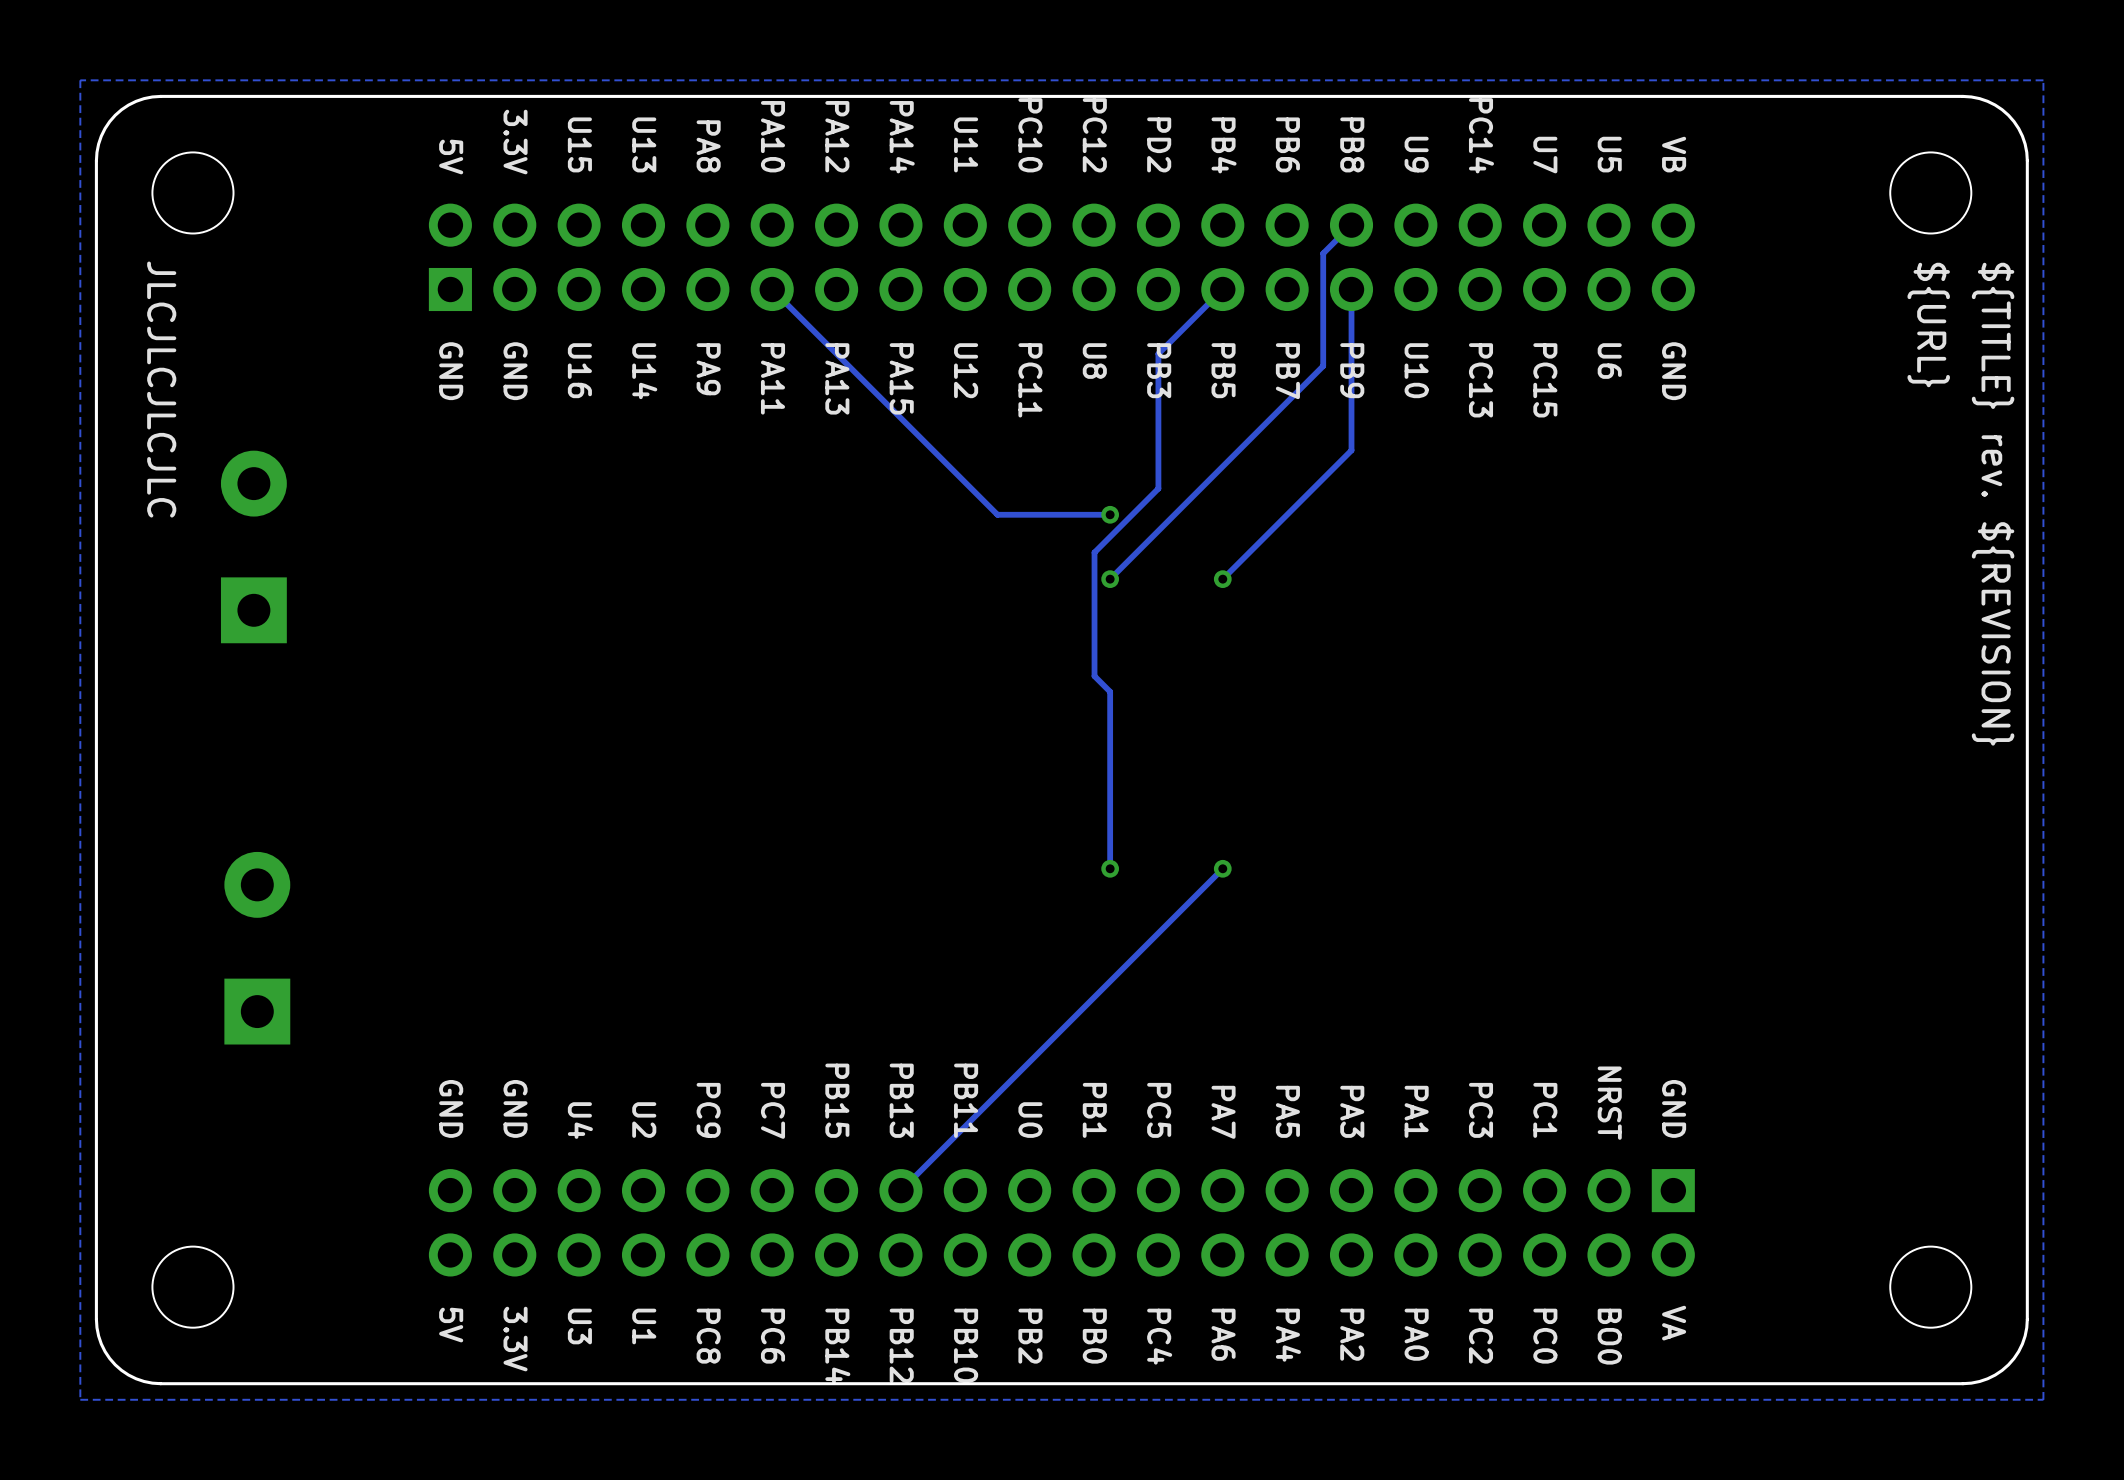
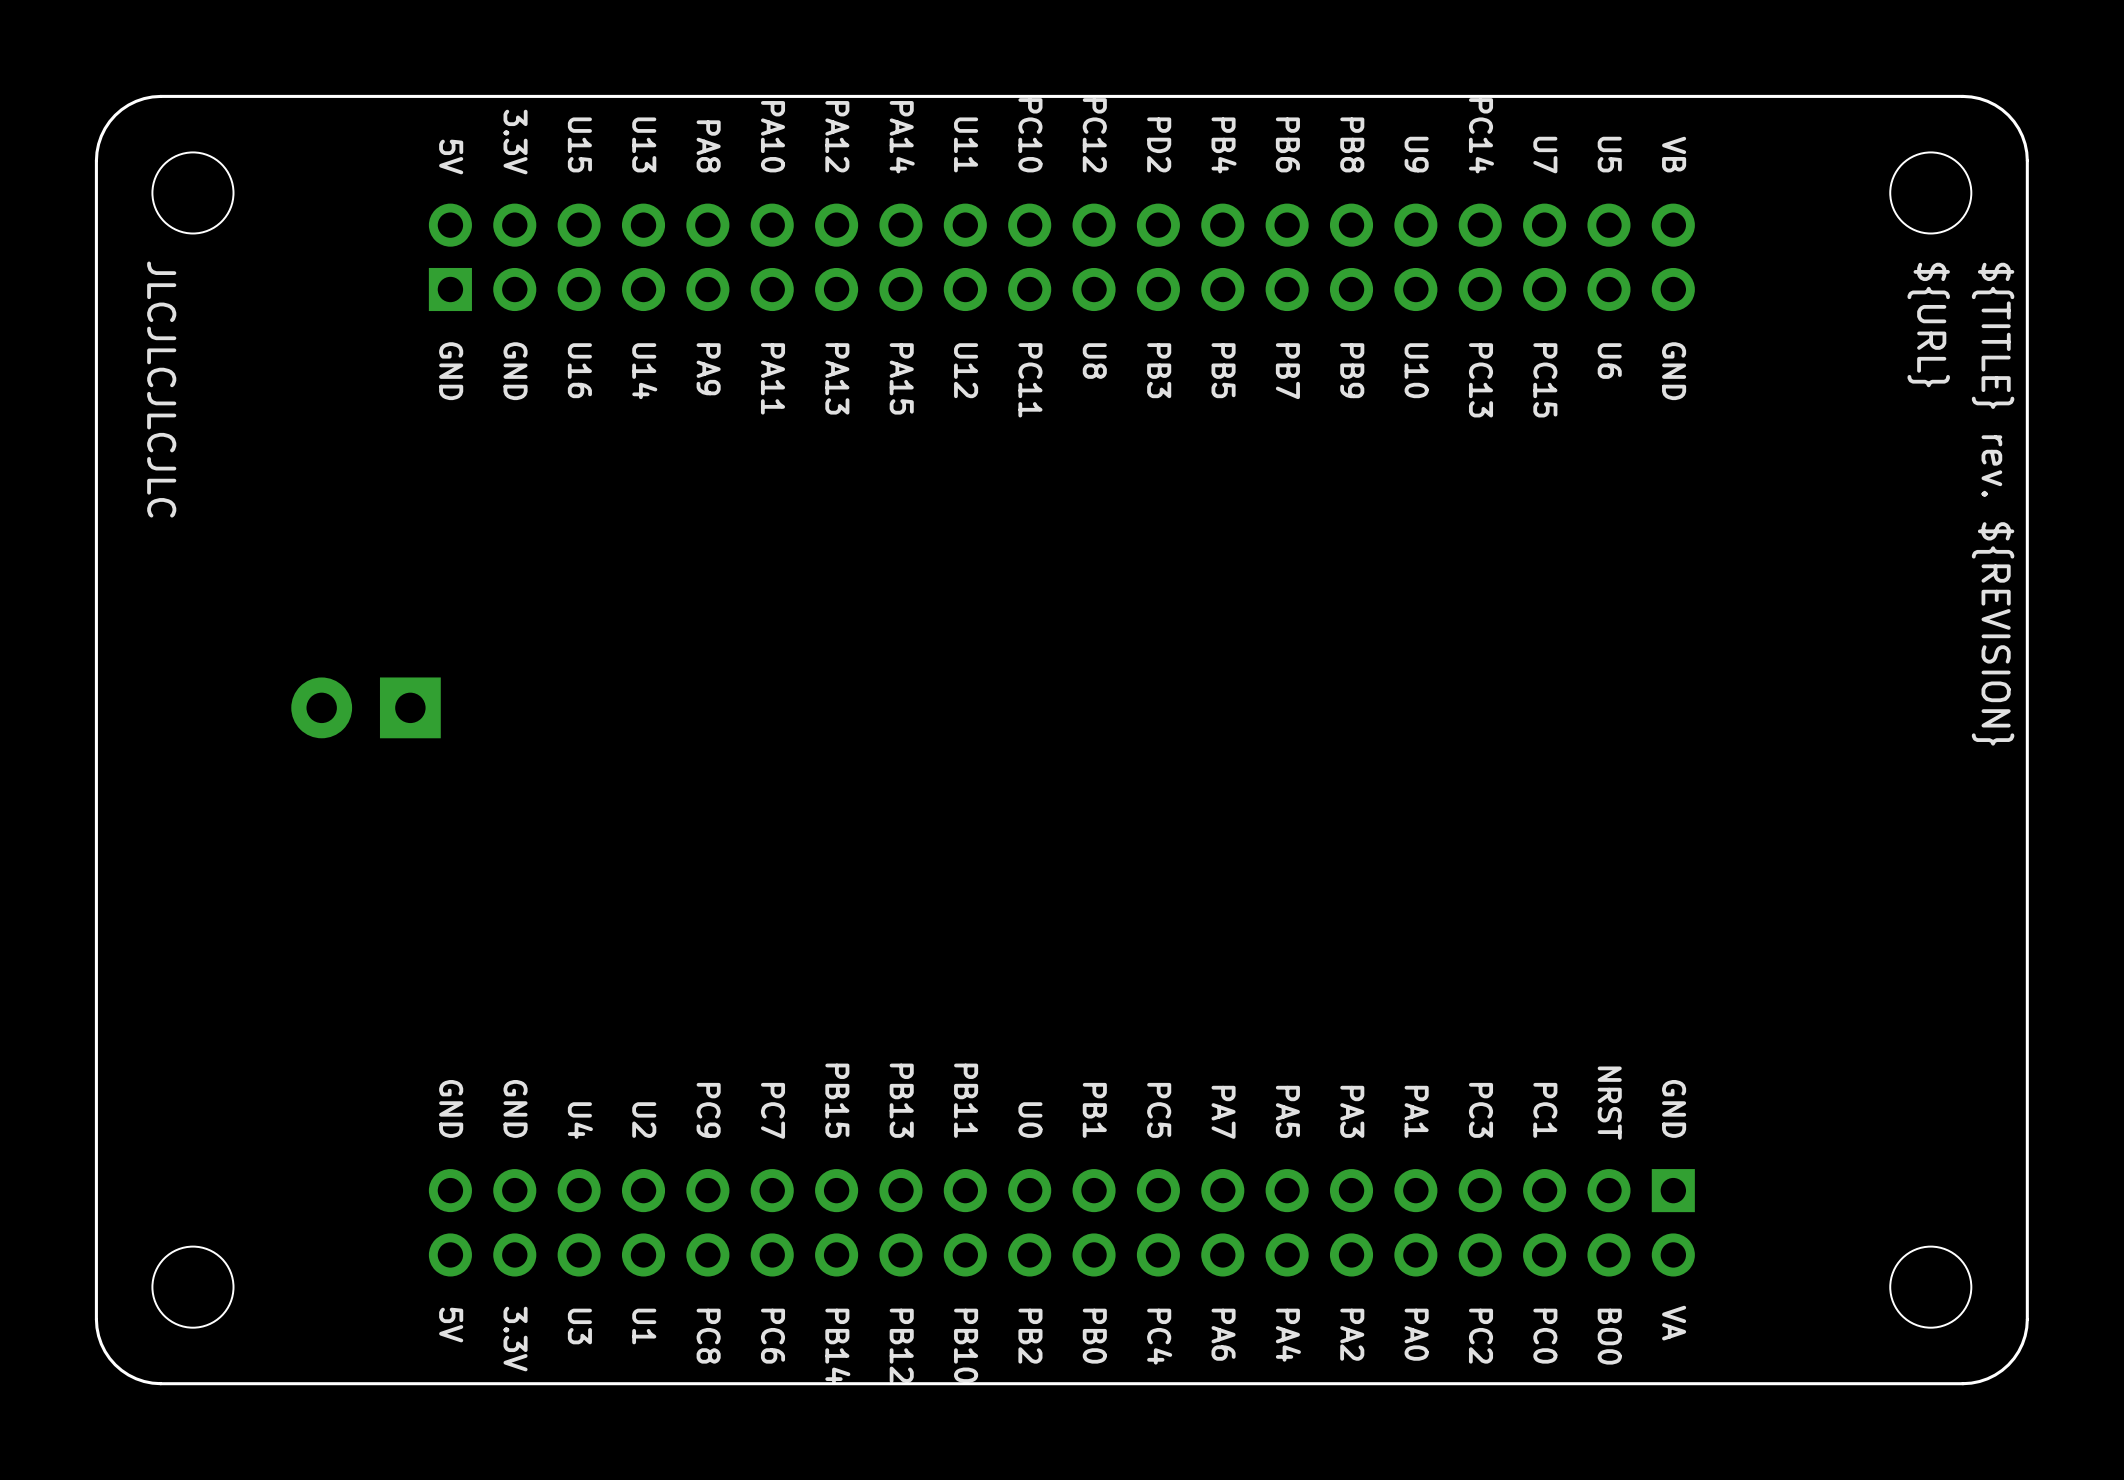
zone outline: (2043, 80) (80, 80) (80, 1399) (2043, 1399) (2043, 80) -> none
track: (1351, 225) (1323, 253) (1323, 366) (1110, 579) -> none
track: (772, 289) (997, 514) (1110, 514) -> none
track: (1222, 289) (1158, 353) (1158, 488) (1094, 552) (1094, 676) (1110, 691) (1110, 868) -> none
track: (1351, 289) (1351, 450) (1222, 579) -> none
via: (1110, 514) -> none
part: (253, 546) -> none
via: (1110, 579) -> none
via: (1222, 579) -> none
part: none -> (366, 707)
via: (1110, 868) -> none
track: (1222, 868) (900, 1190) -> none
via: (1222, 868) -> none
part: (257, 948) -> none

